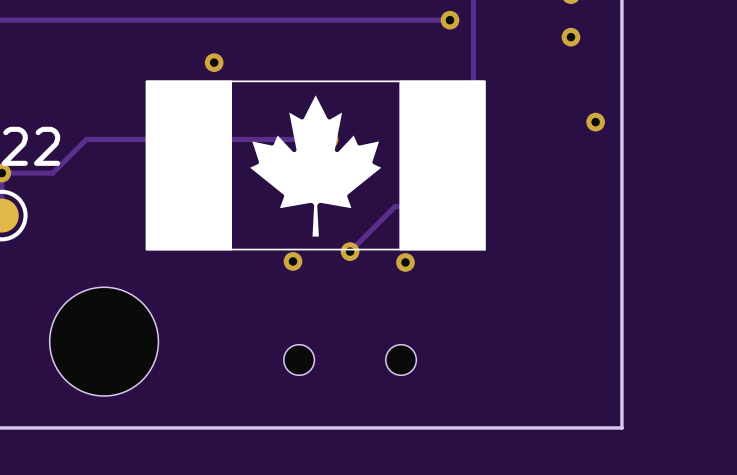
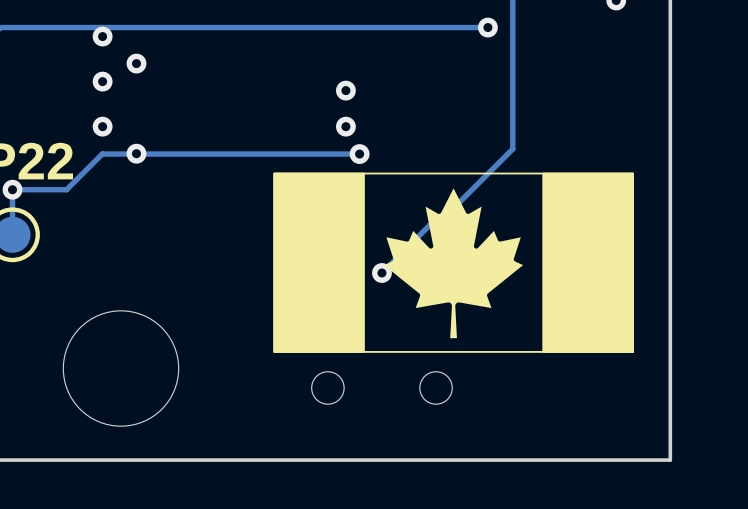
via: none -> (102, 36)
via: (570, 37) -> none
via: none -> (136, 63)
via: (214, 62) -> none
via: none -> (102, 81)
via: none -> (345, 90)
via: none -> (102, 126)
via: none -> (345, 126)
via: (595, 122) -> none
via: none -> (136, 153)
drawing position: (315, 165) -> (453, 262)

